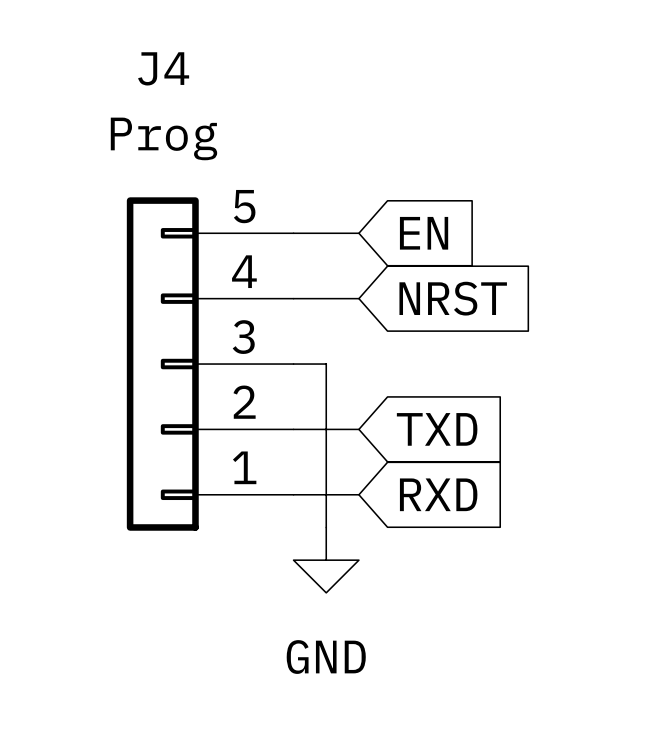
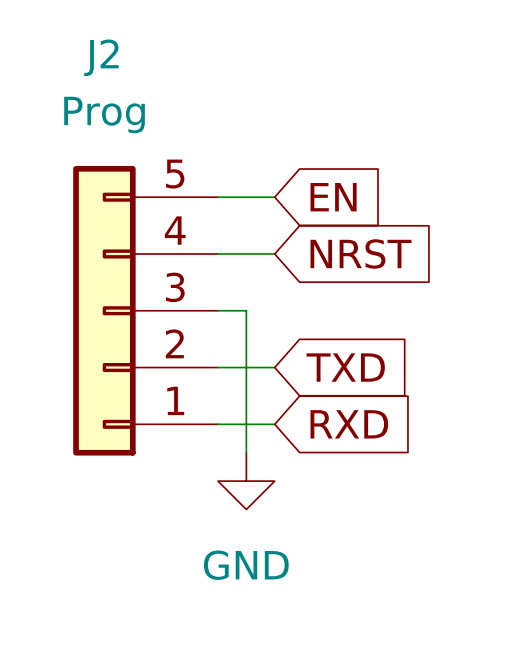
J4 name: J4 (163, 68) -> J2 (101, 57)

